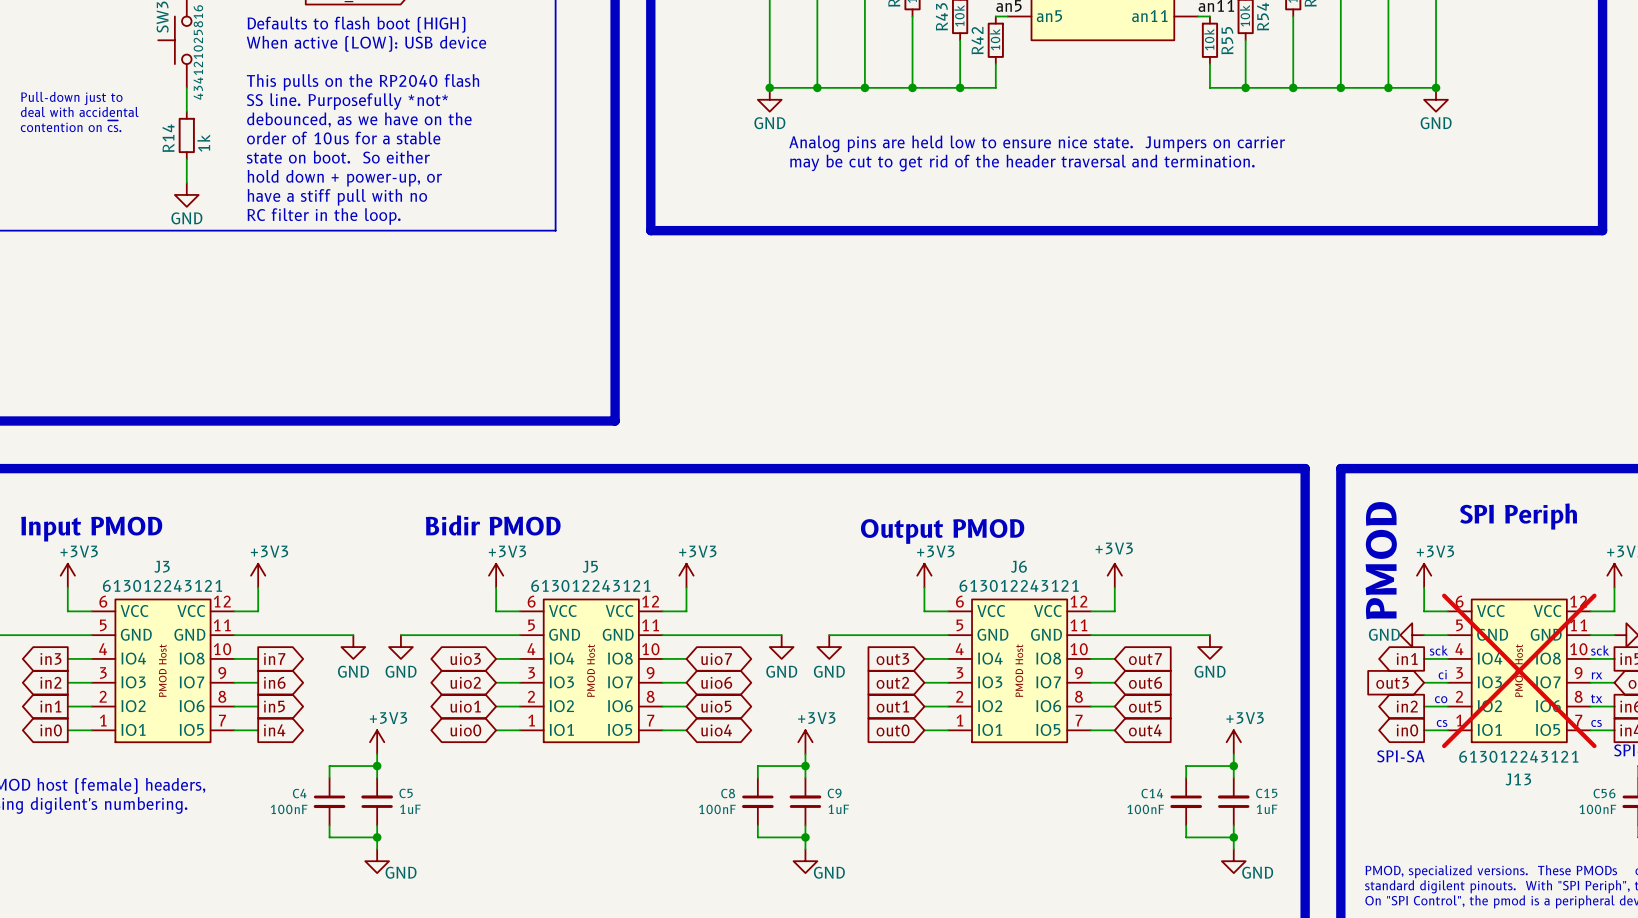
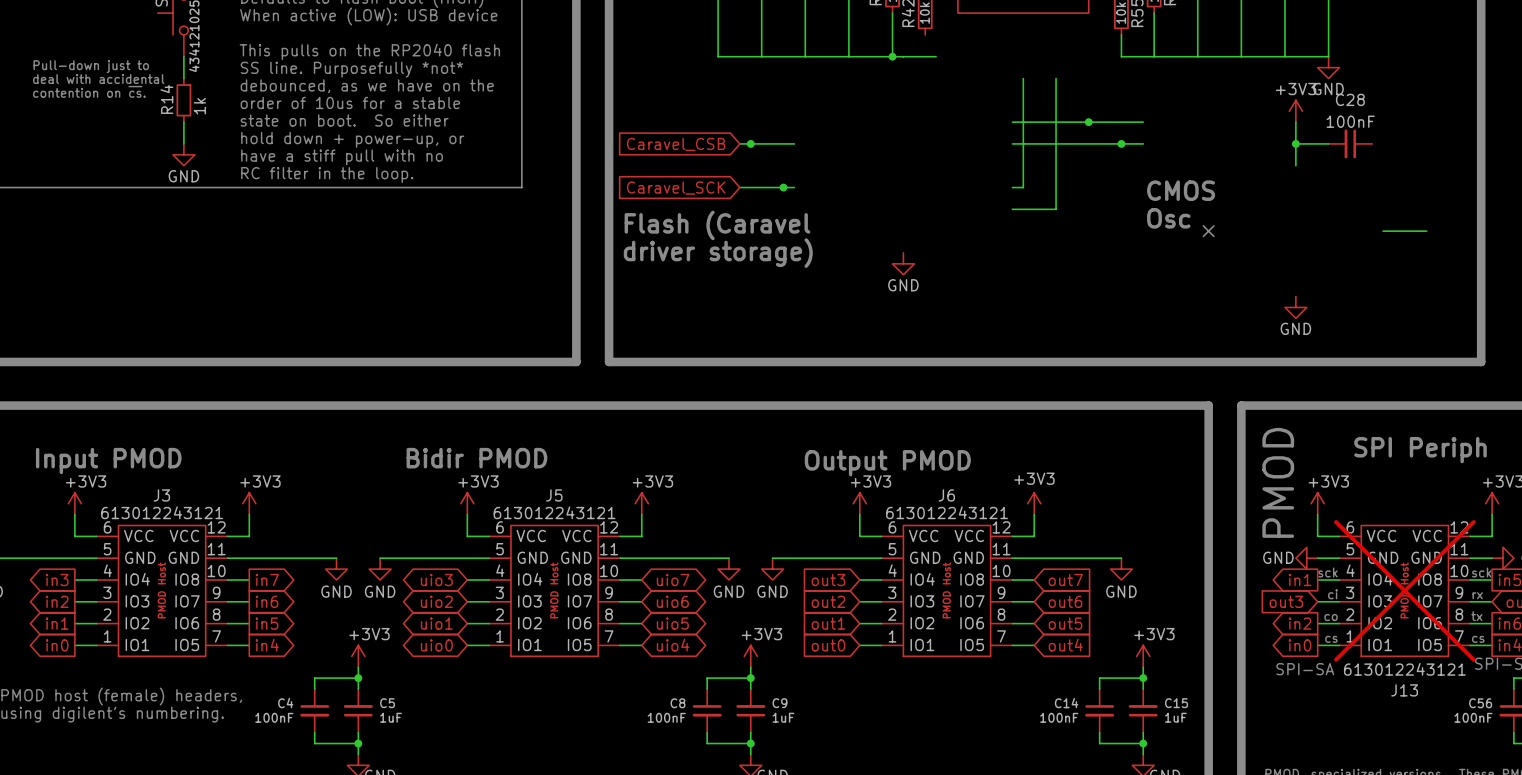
wire: (995, 64) (995, 87) -> (936, 56) (925, 56)
junction: (769, 87) -> none
junction: (817, 87) -> none
junction: (864, 87) -> none
junction: (912, 87) -> none
junction: (1245, 87) -> none
junction: (1293, 87) -> none
junction: (1340, 87) -> none
junction: (1388, 87) -> none
junction: (1436, 87) -> none
power symbol: GND (769, 99) -> none
wire: none -> (1023, 78) (1023, 187) (1012, 187)
wire: none -> (1056, 78) (1056, 209) (1012, 209)
text: Analog pins are held low to ensure nice state. Jumpers on carrier (1037, 143) -> none
power symbol: none -> +3V3 (1295, 111)
wire: none -> (1012, 122) (1143, 122)
junction: none -> (1088, 122)
wire: none -> (1295, 122) (1295, 165)
text: may be cut to get rid of the header traversal and termination. (1022, 163) -> none
wire: none -> (739, 143) (794, 143)
junction: none -> (750, 143)
wire: none -> (1012, 143) (1143, 143)
junction: none -> (1121, 143)
wire: none -> (1295, 143) (1328, 143)
junction: none -> (1295, 143)
C28: none -> 100nF (1350, 143)
global label: none -> Caravel_CSB (676, 144)
line: (650, 230) (1602, 230) -> (609, 187) (609, 361) (1481, 361) (1481, 187)
junction: none -> (783, 187)
global label: none -> Caravel_SCK (676, 188)
text: none -> CMOS (1181, 190)
text: none -> Osc (1168, 218)
text: none -> Flash (Caravel (717, 225)
no-connect mark: none -> (1208, 231)
wire: none -> (1383, 231) (1426, 231)
text: none -> driver storage) (718, 253)
power symbol: none -> GND (903, 263)
power symbol: none -> GND (1295, 307)

